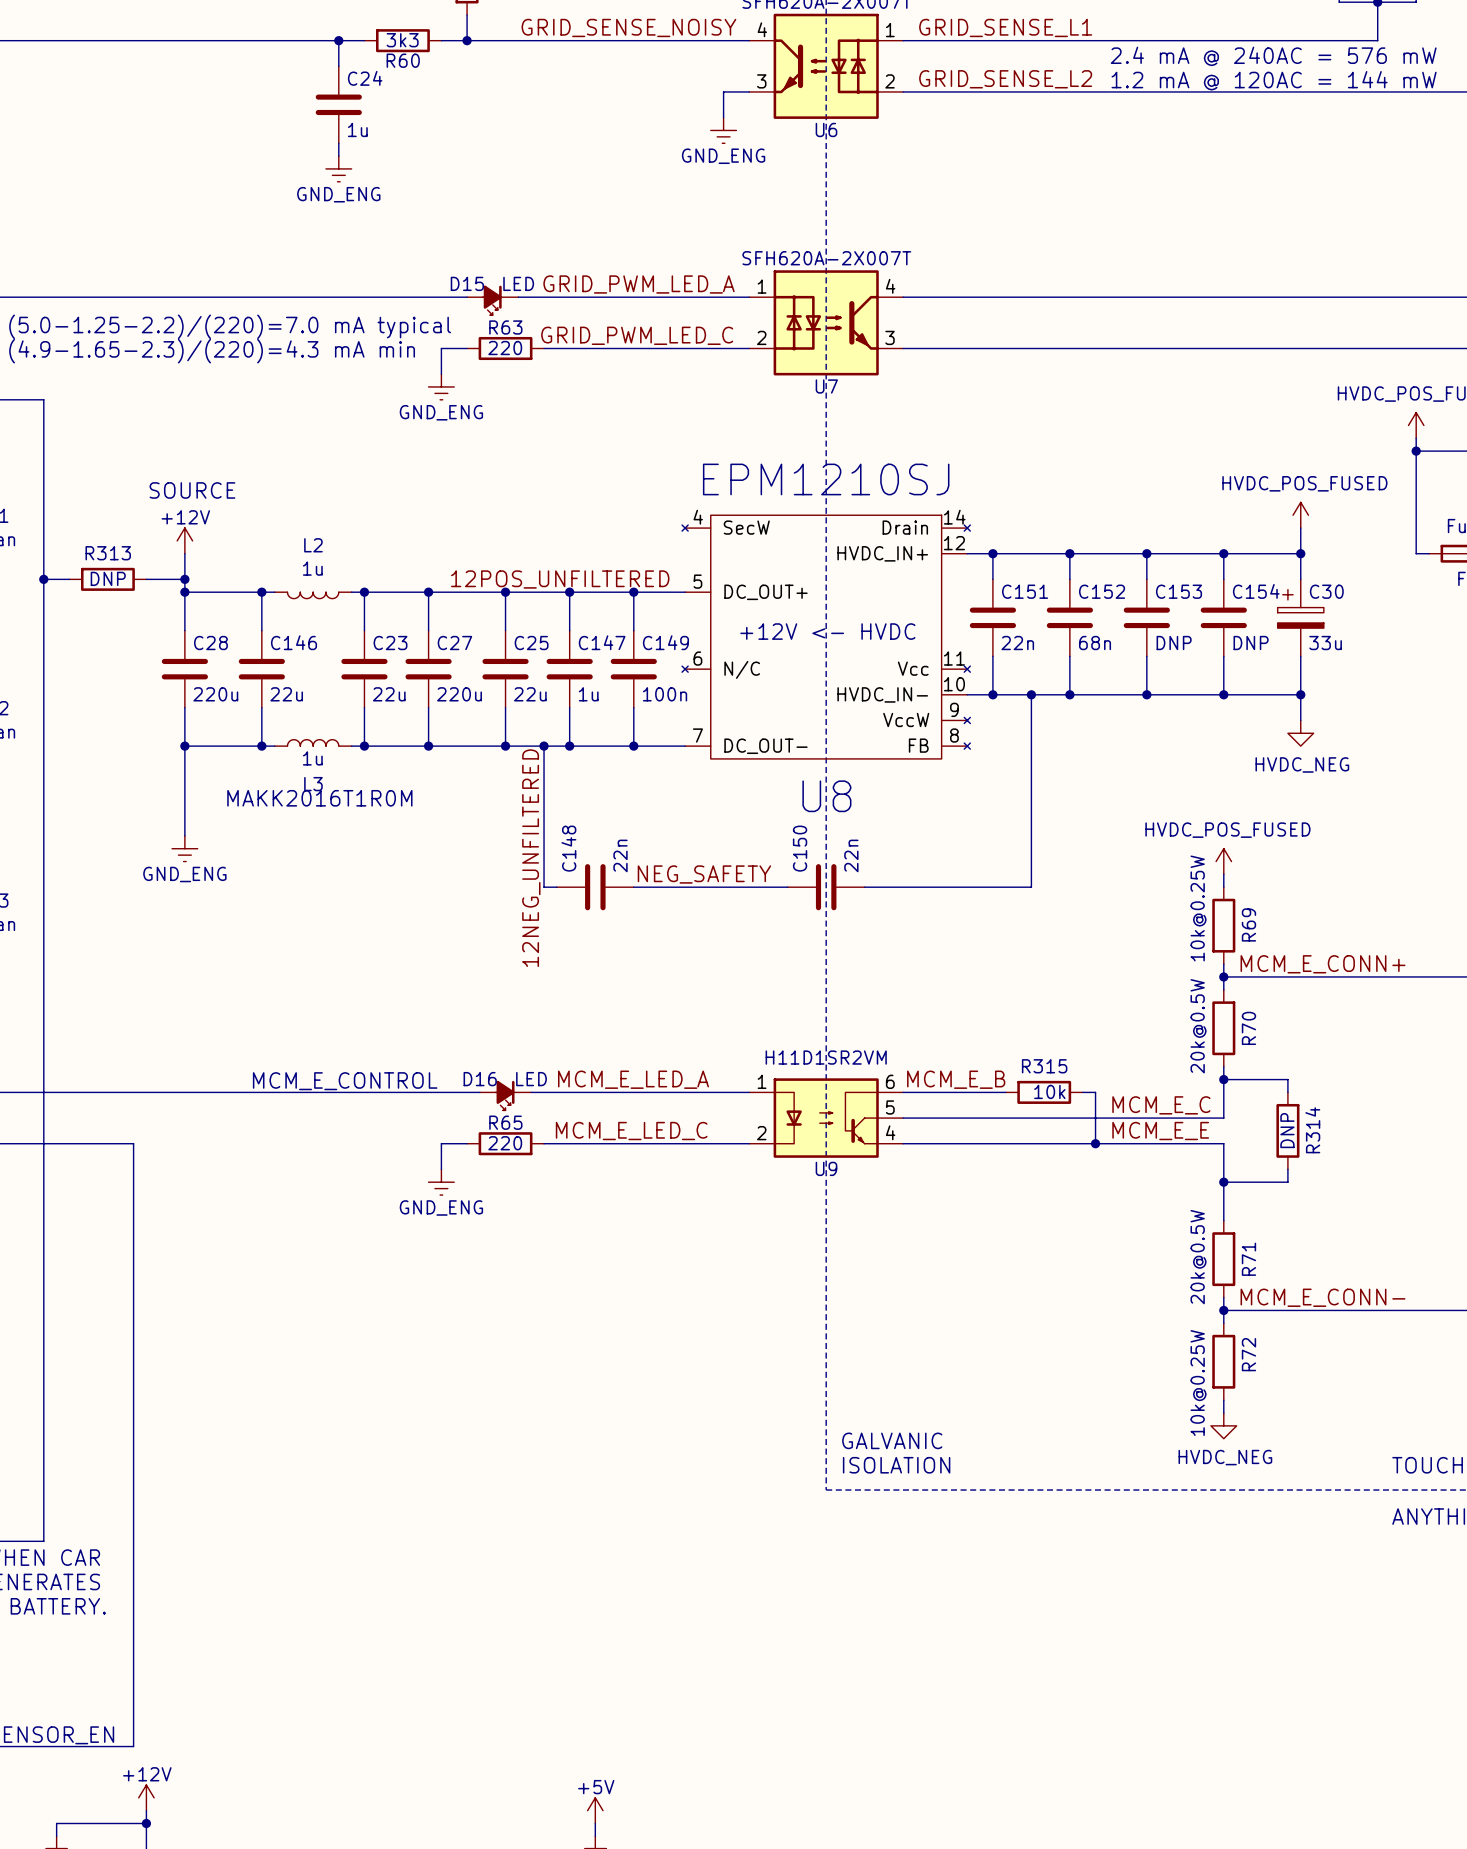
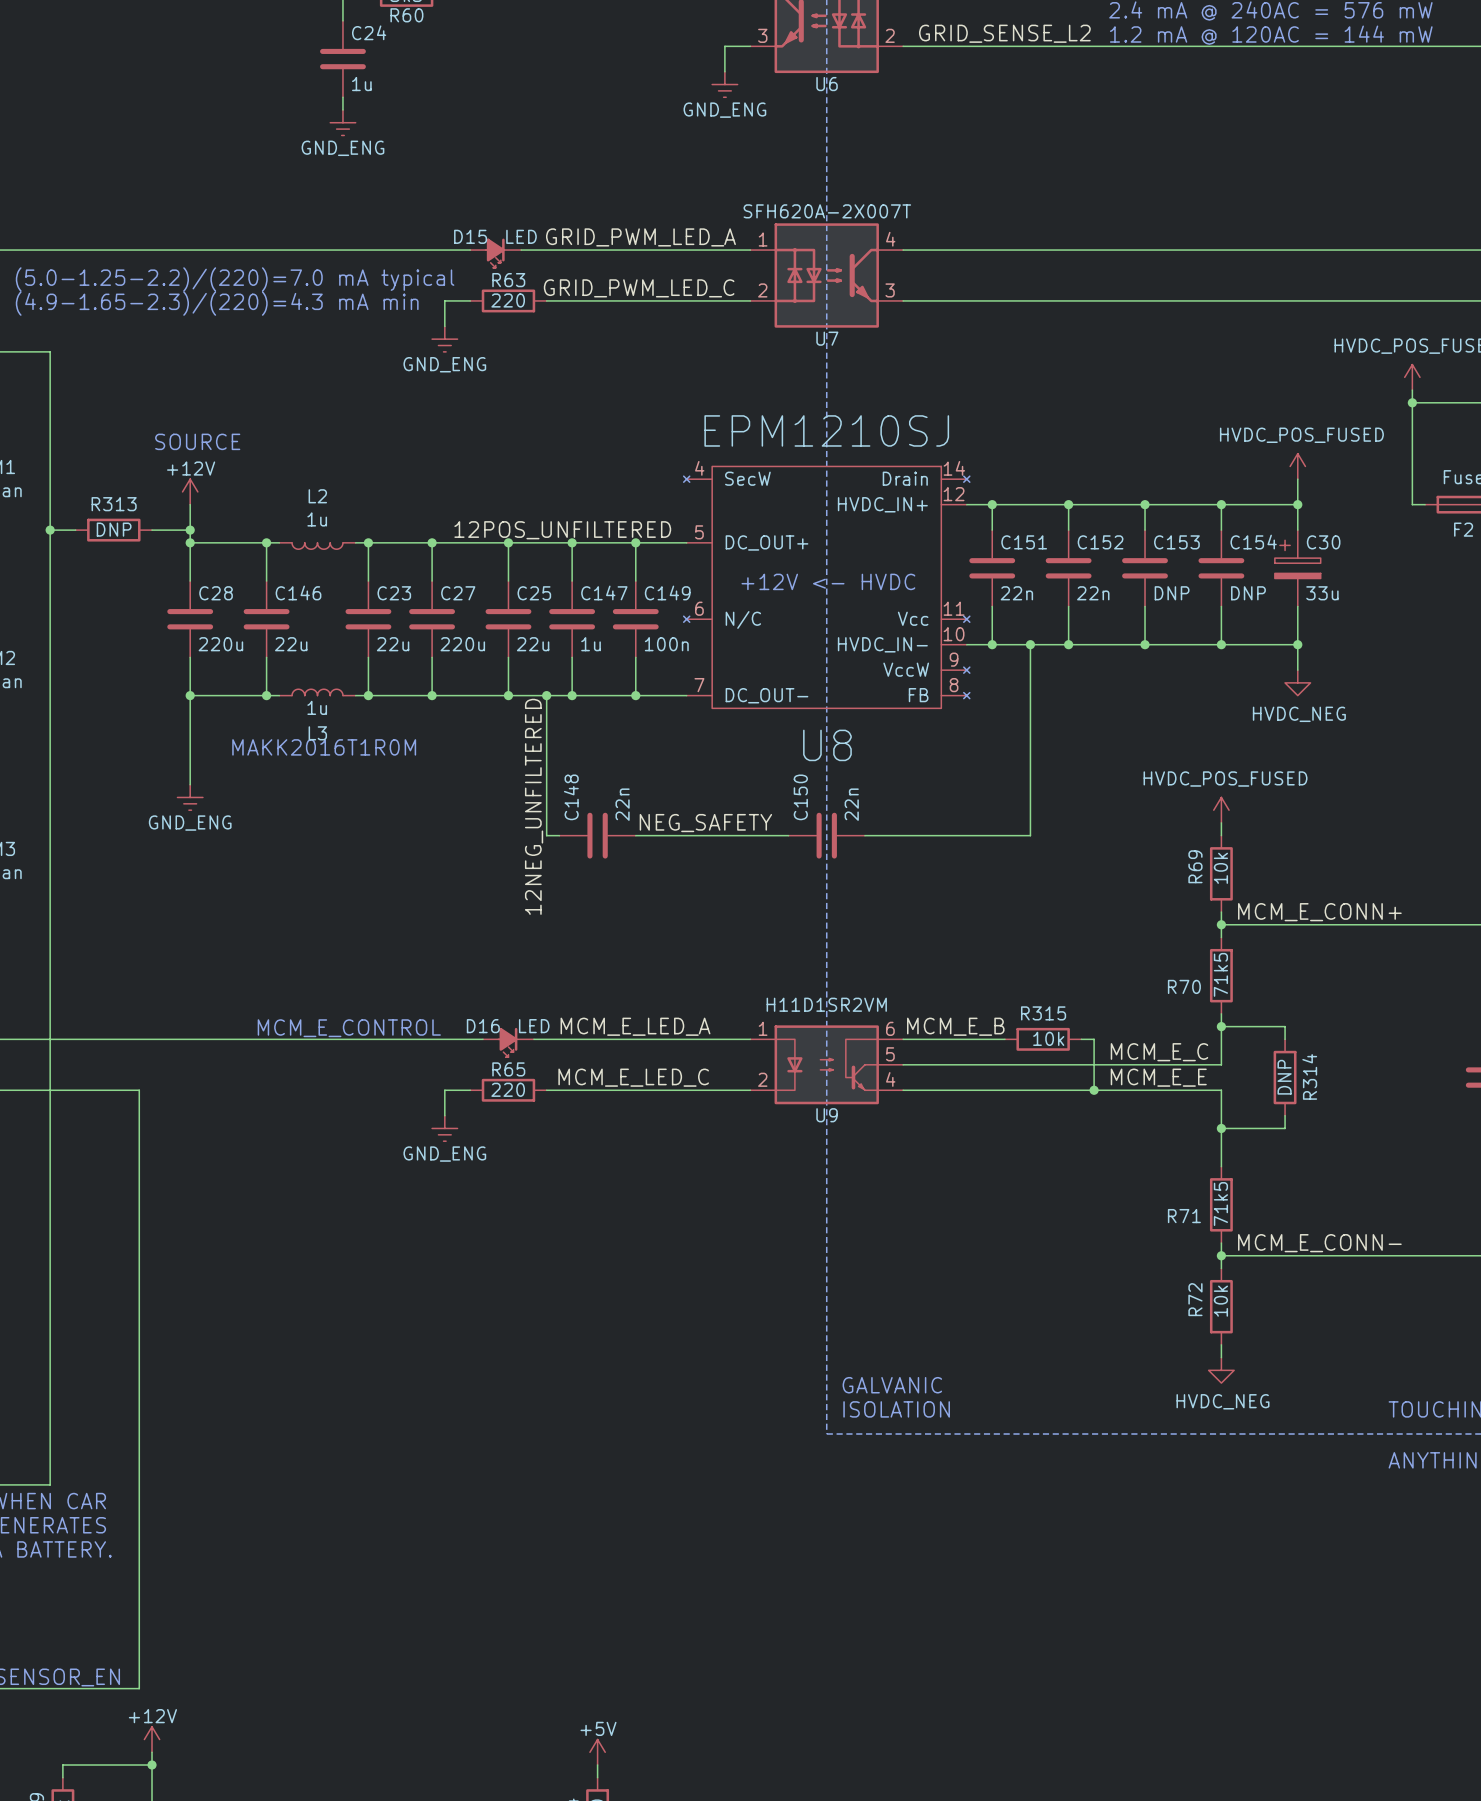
C152 value: 68n (1095, 643) -> 22n (1093, 593)
R69 value: 10k@0.25W (1198, 908) -> 10k (1220, 868)
R69 name position: R69 (1248, 924) -> R69 (1195, 866)
R70 value: 20k@0.5W (1198, 1026) -> 71k5 (1220, 974)
R70 name rotation: 0° (1248, 1028) -> 90° clockwise (1184, 986)
R70 name position: R70 (1248, 1028) -> R70 (1184, 986)
R71 value: 20k@0.5W (1198, 1257) -> 71k5 (1220, 1204)
R71 name rotation: 0° (1248, 1259) -> 90° clockwise (1184, 1216)
R71 name position: R71 (1248, 1259) -> R71 (1184, 1216)
R72 name position: R72 (1248, 1354) -> R72 (1195, 1299)
R72 value: 10k@0.25W (1198, 1383) -> 10k (1220, 1301)

